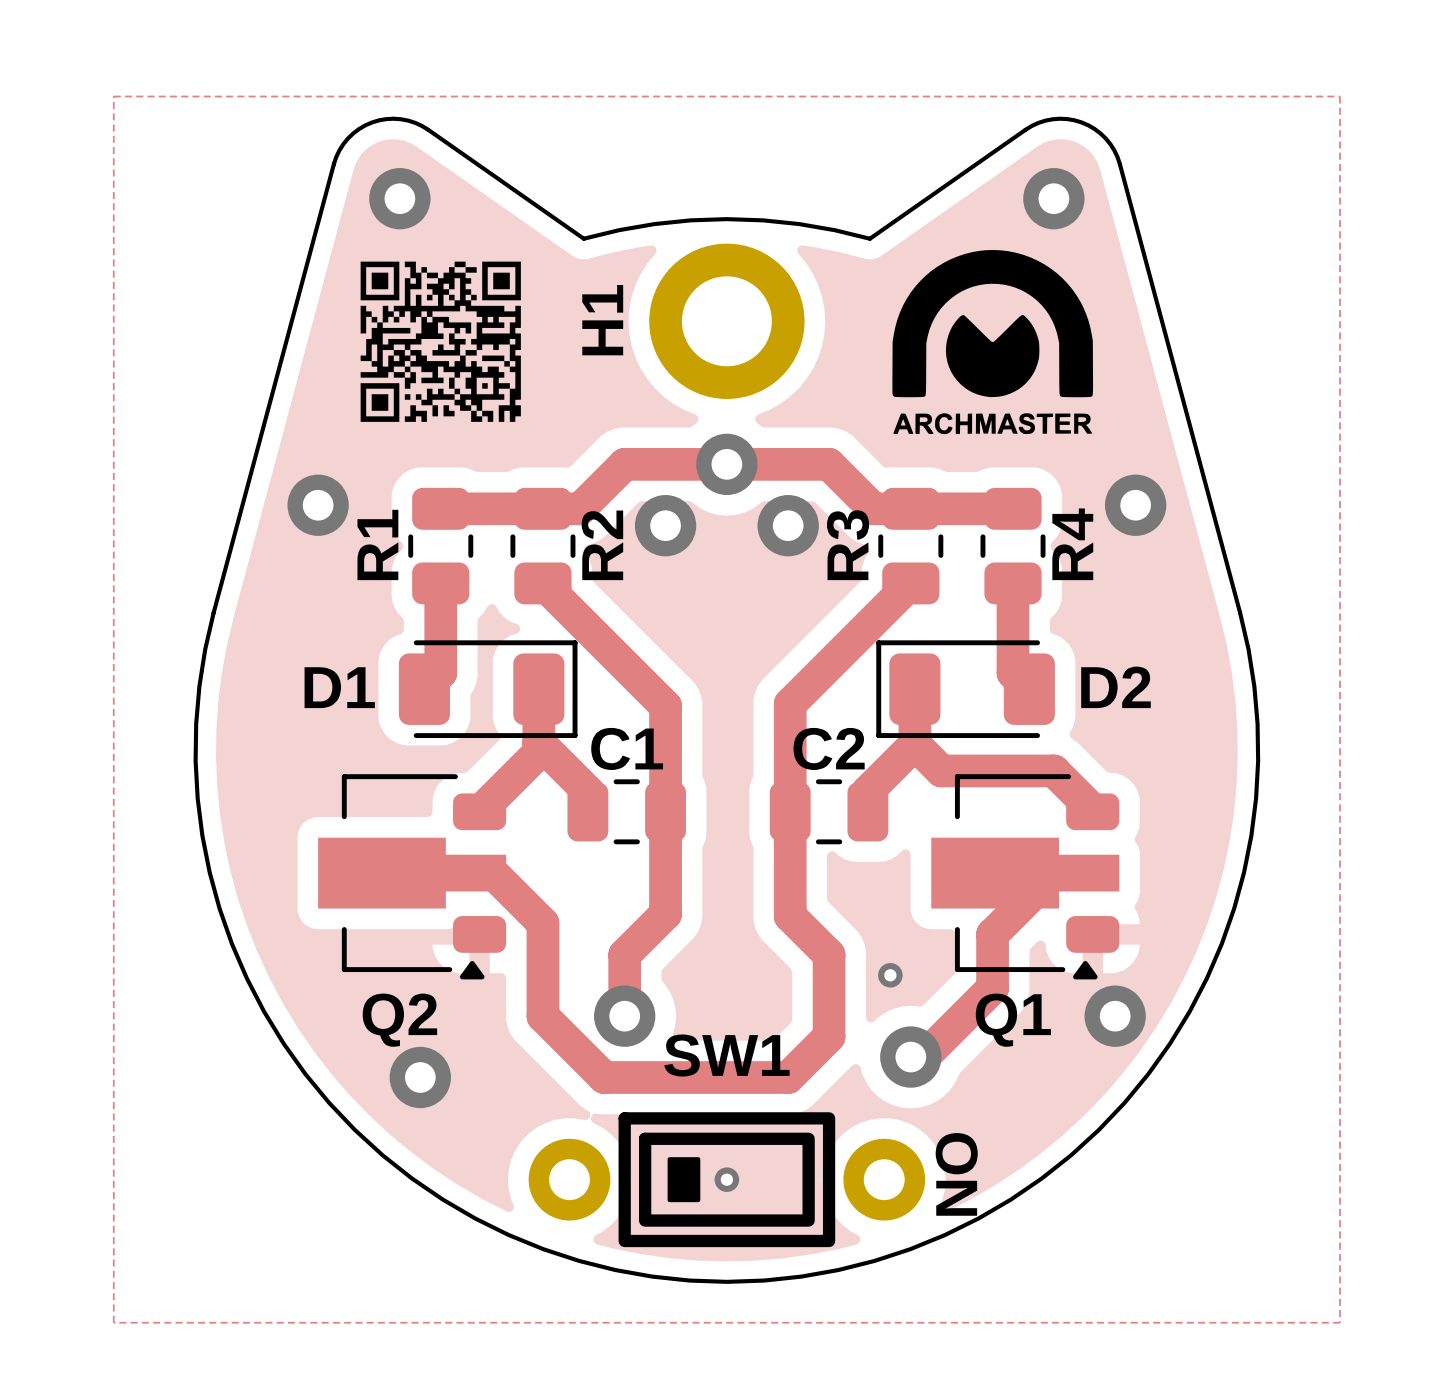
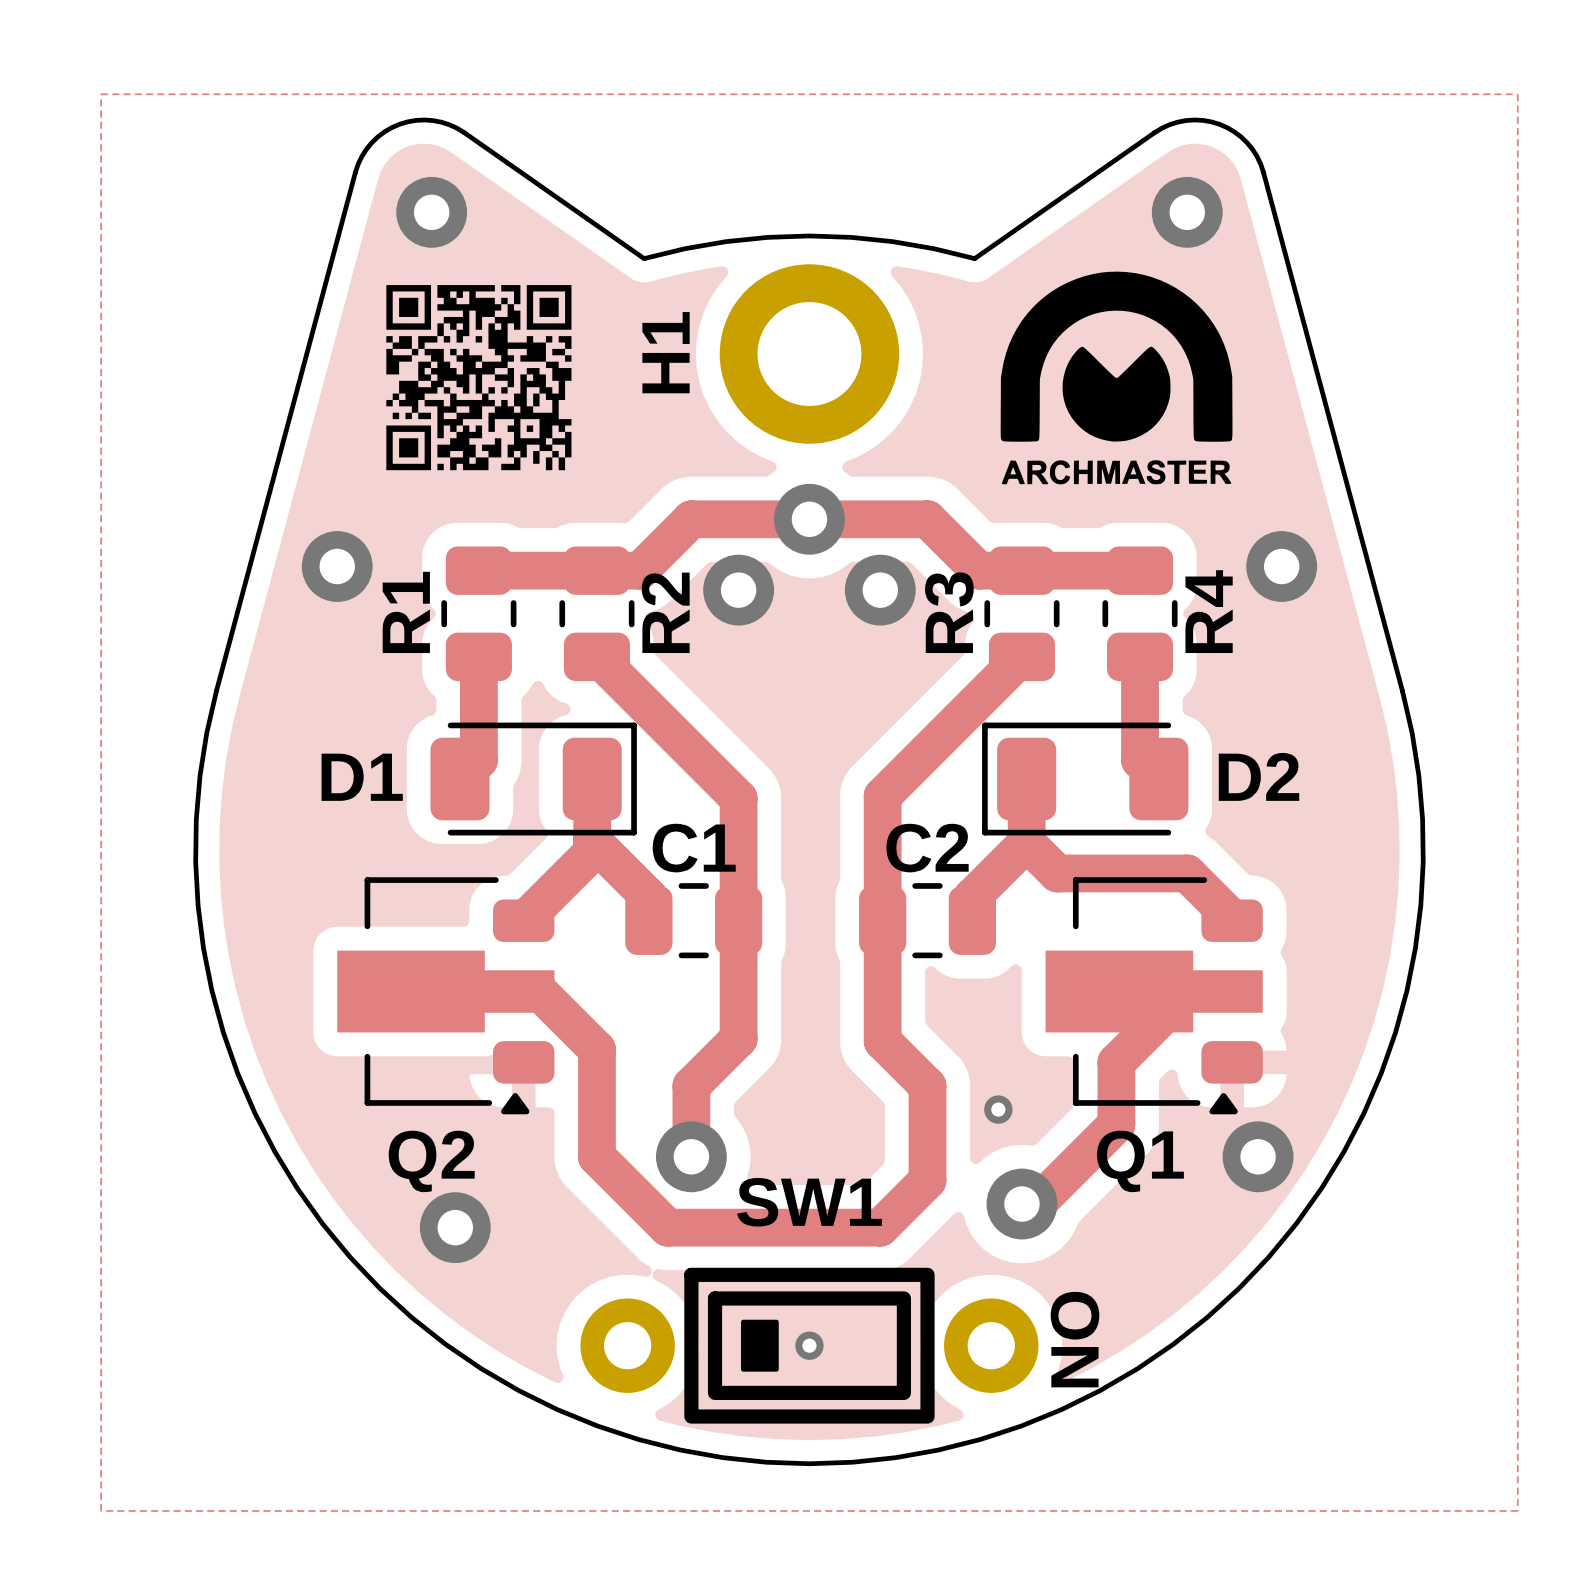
drawing shape: [360, 261, 521, 422] -> [386, 285, 572, 471]

